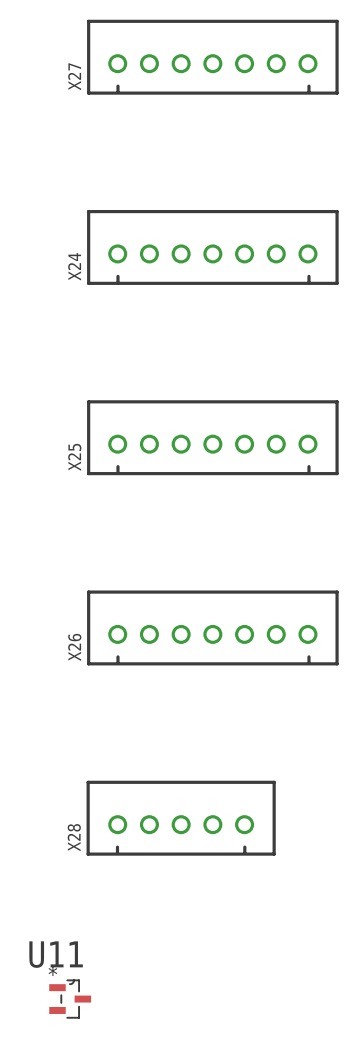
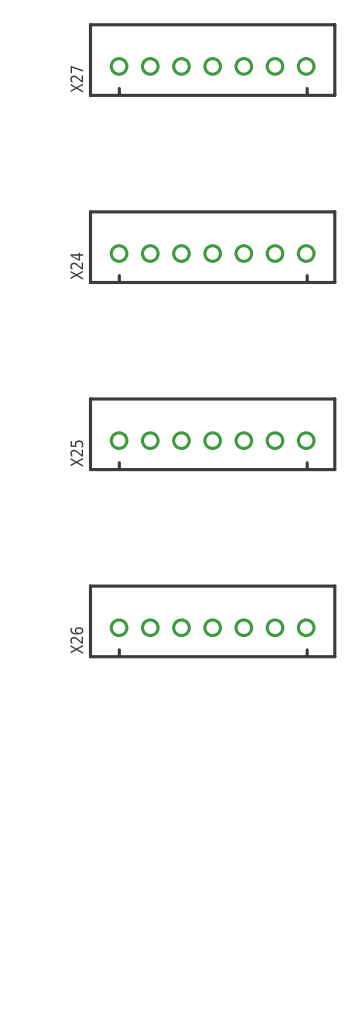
X28: (181, 818) -> none
U11: (70, 999) -> none

